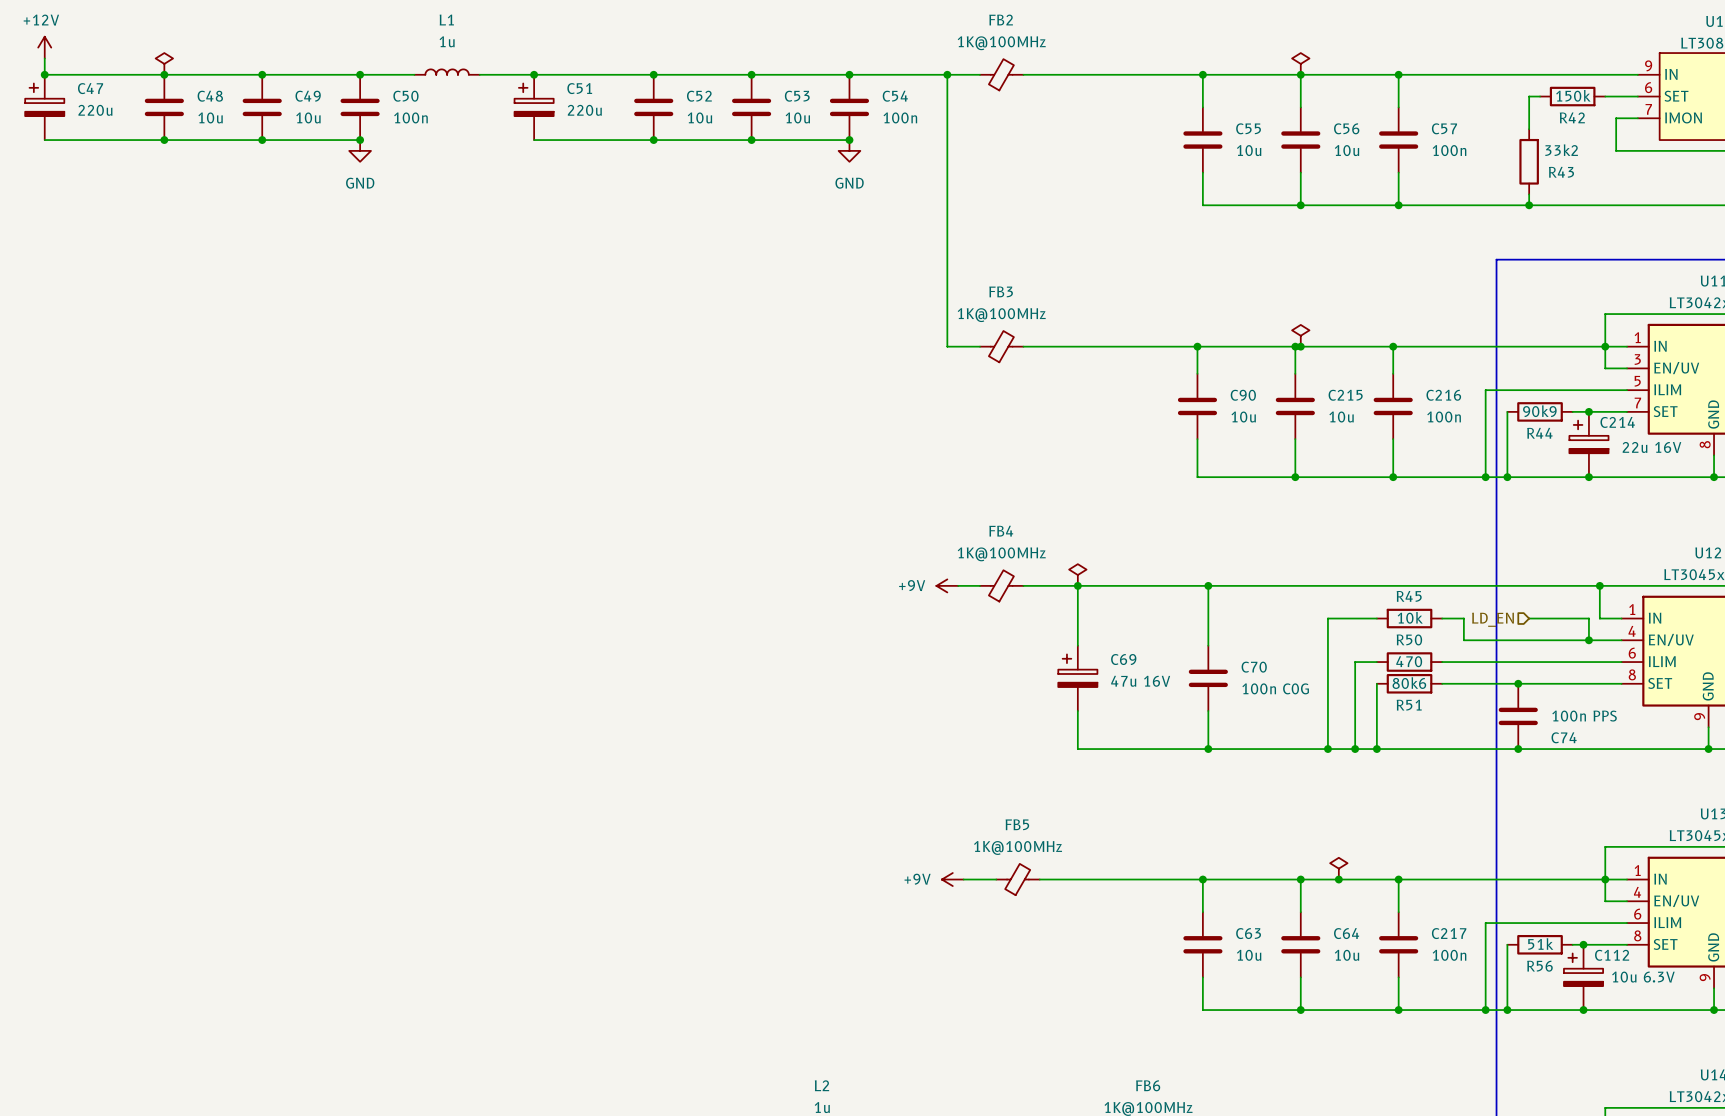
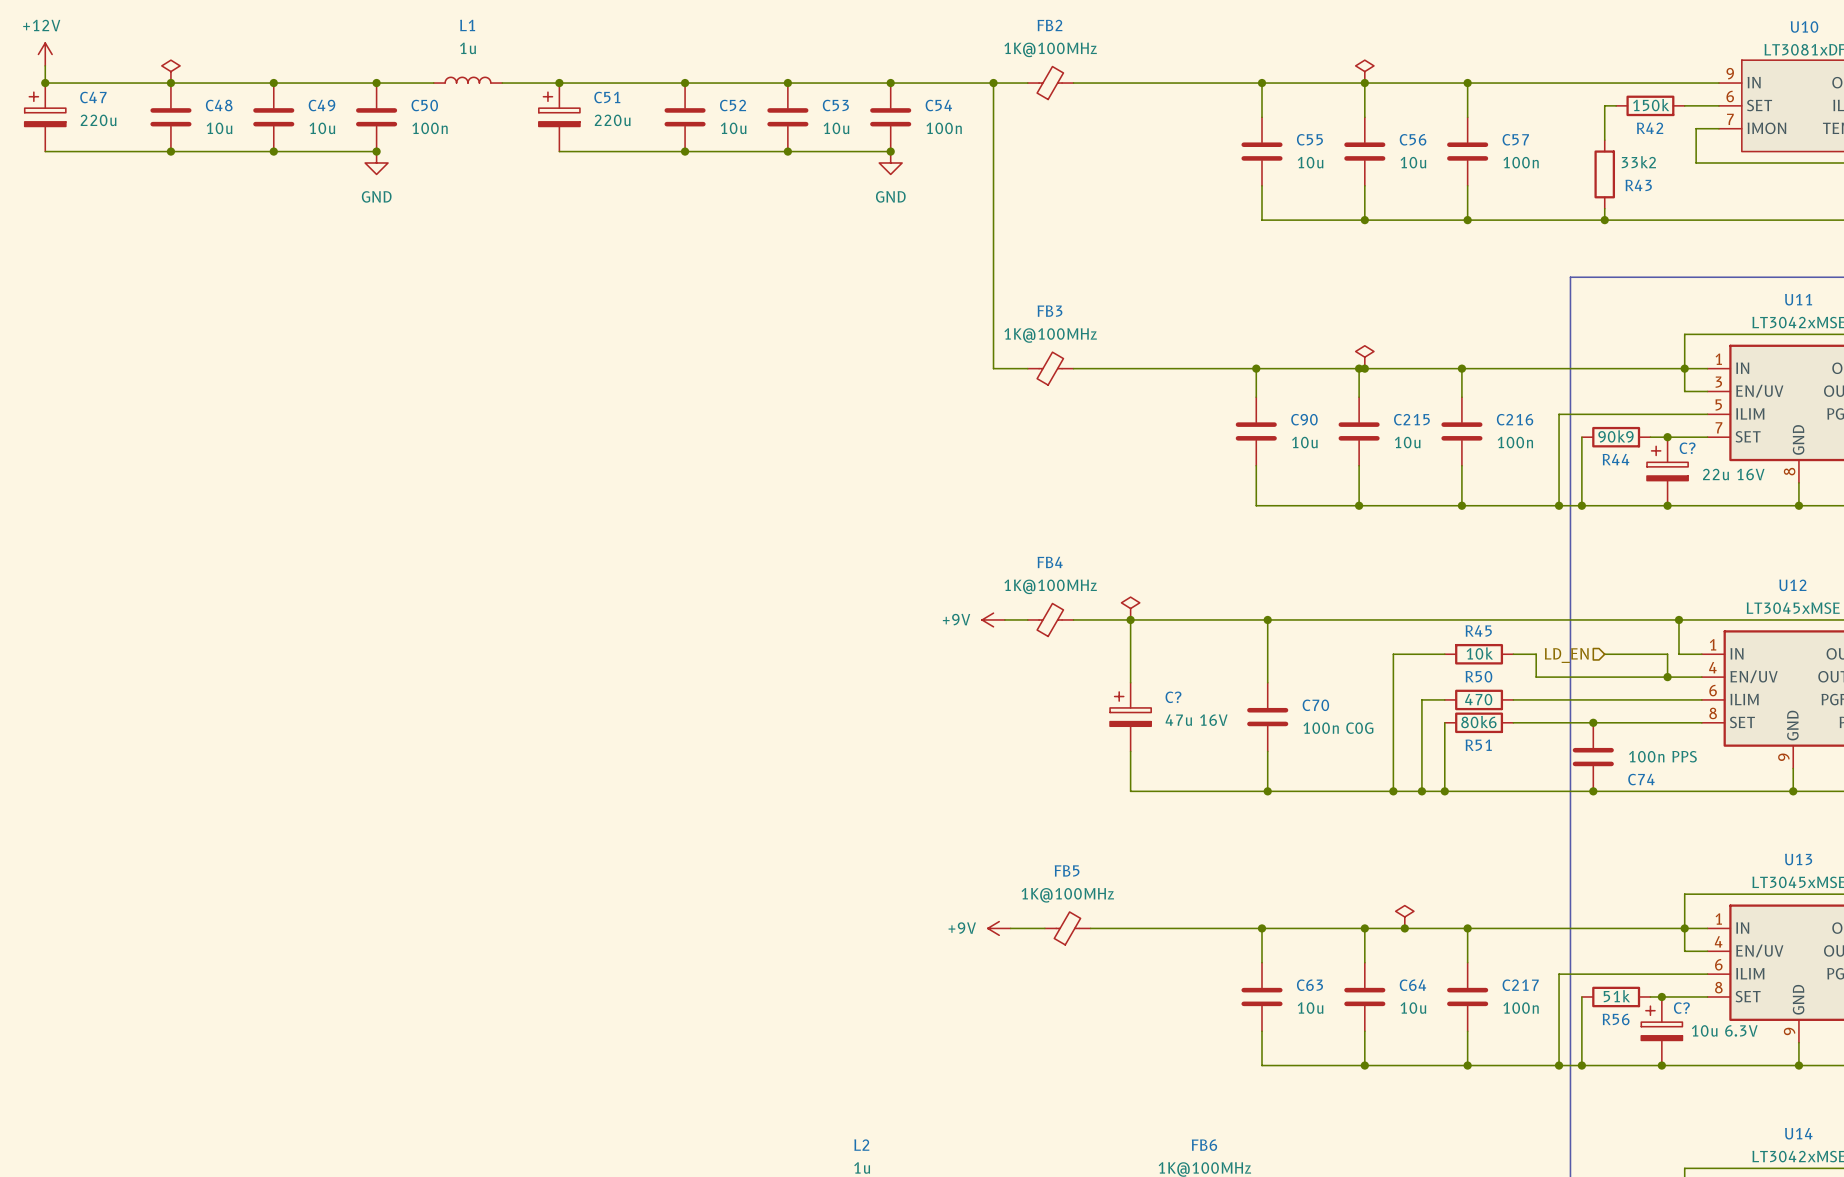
C214 name: C214 (1617, 422) -> C? (1687, 448)
C69 name: C69 (1123, 659) -> C? (1173, 697)
C112 name: C112 (1612, 955) -> C? (1681, 1008)

